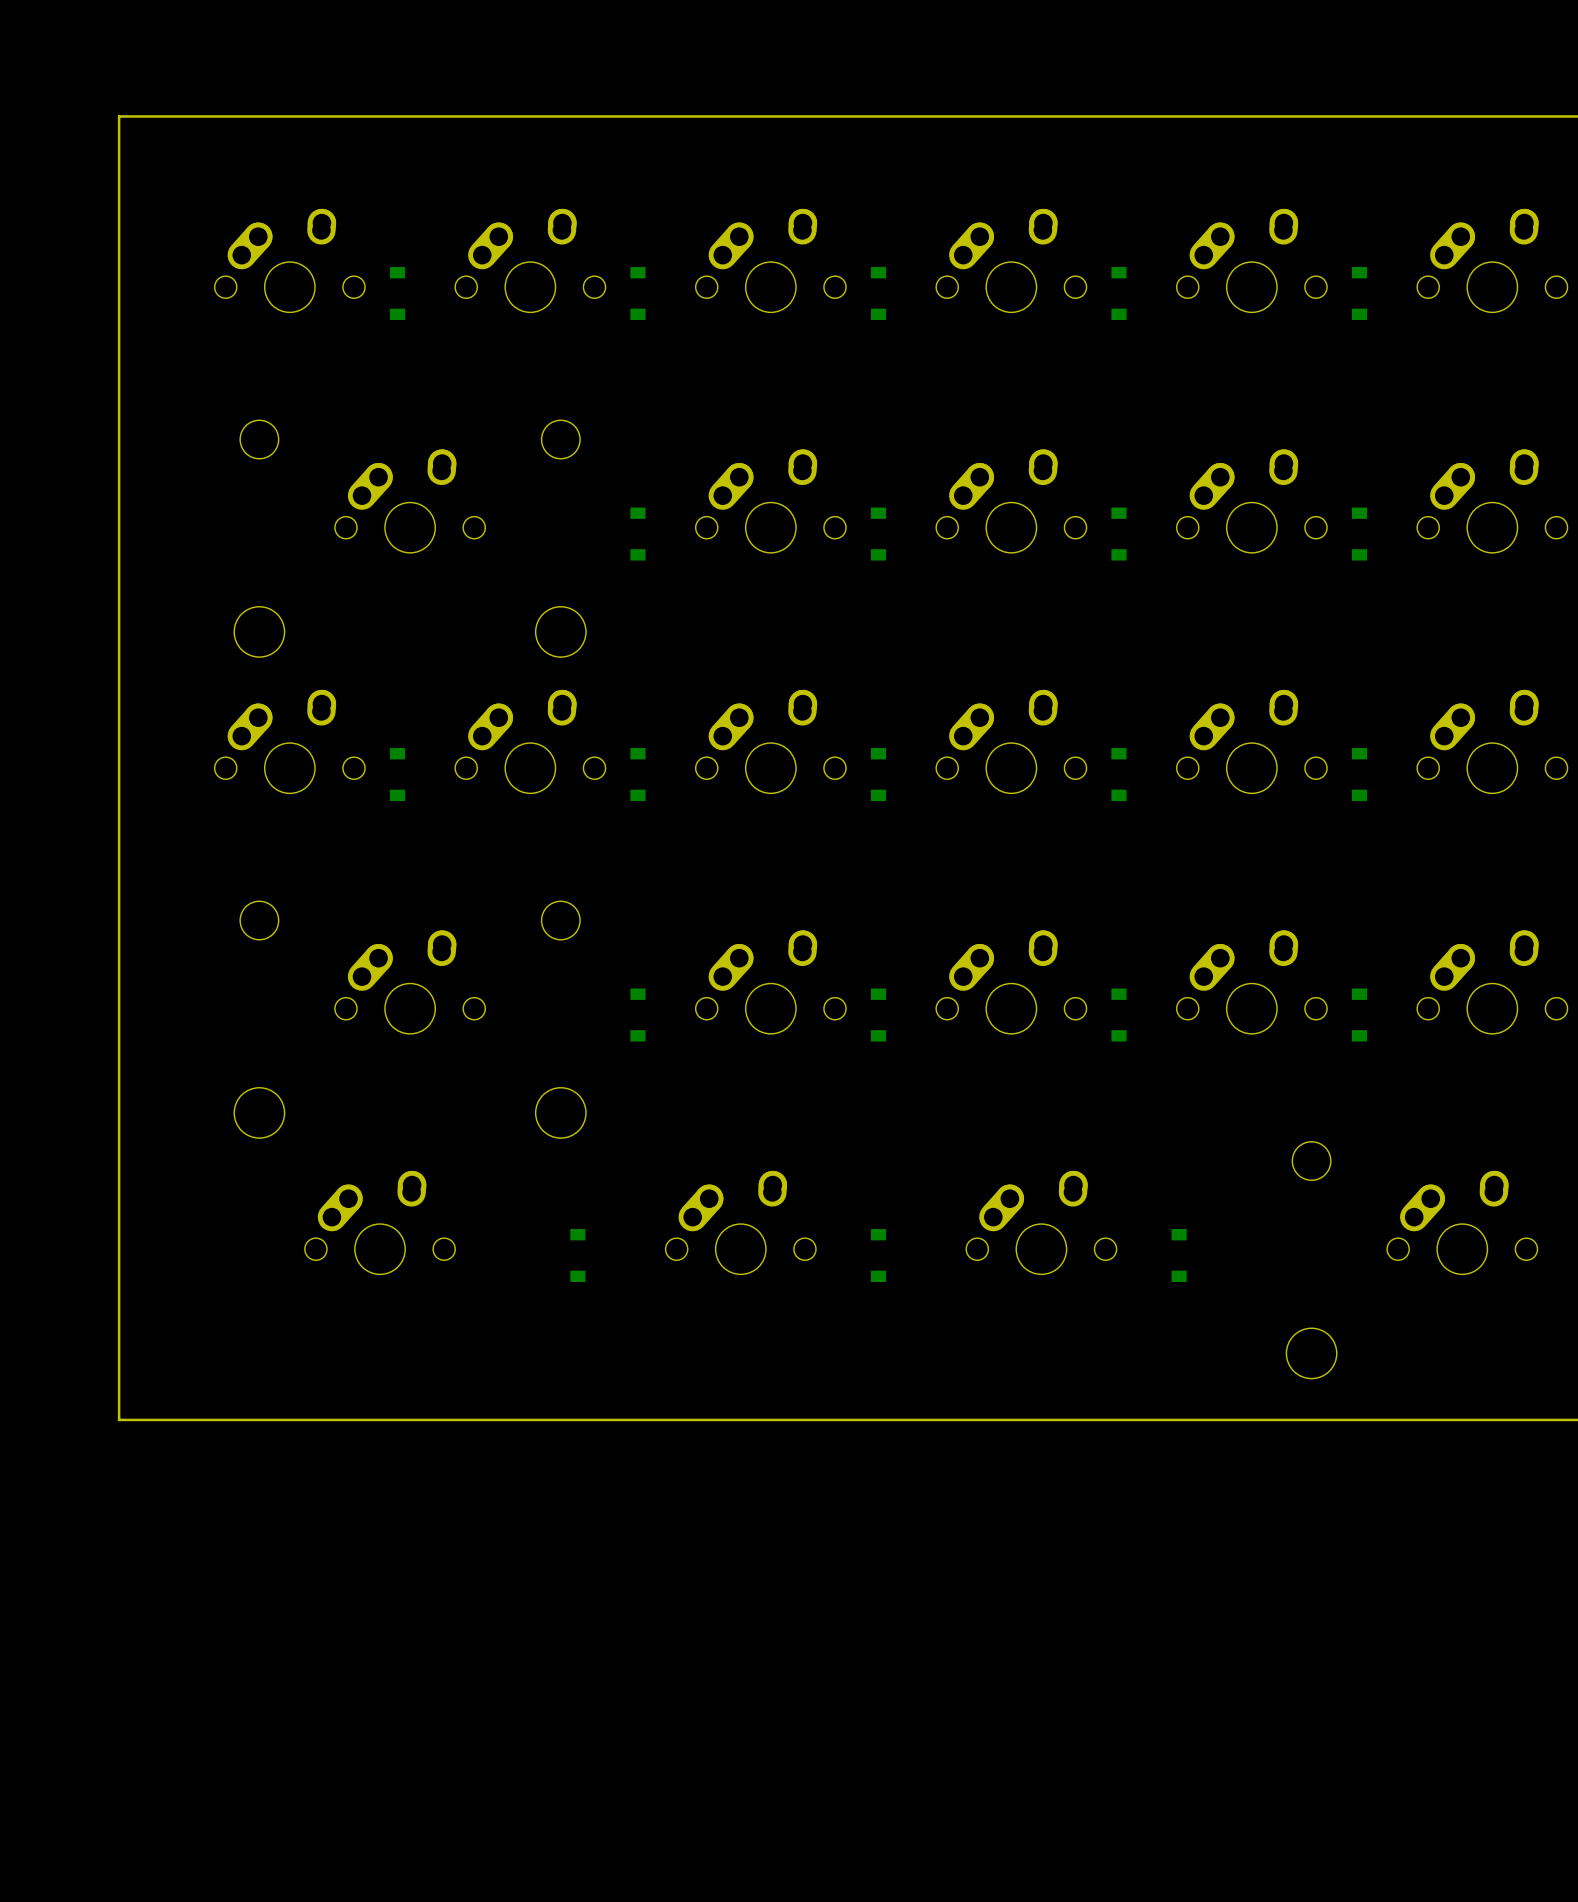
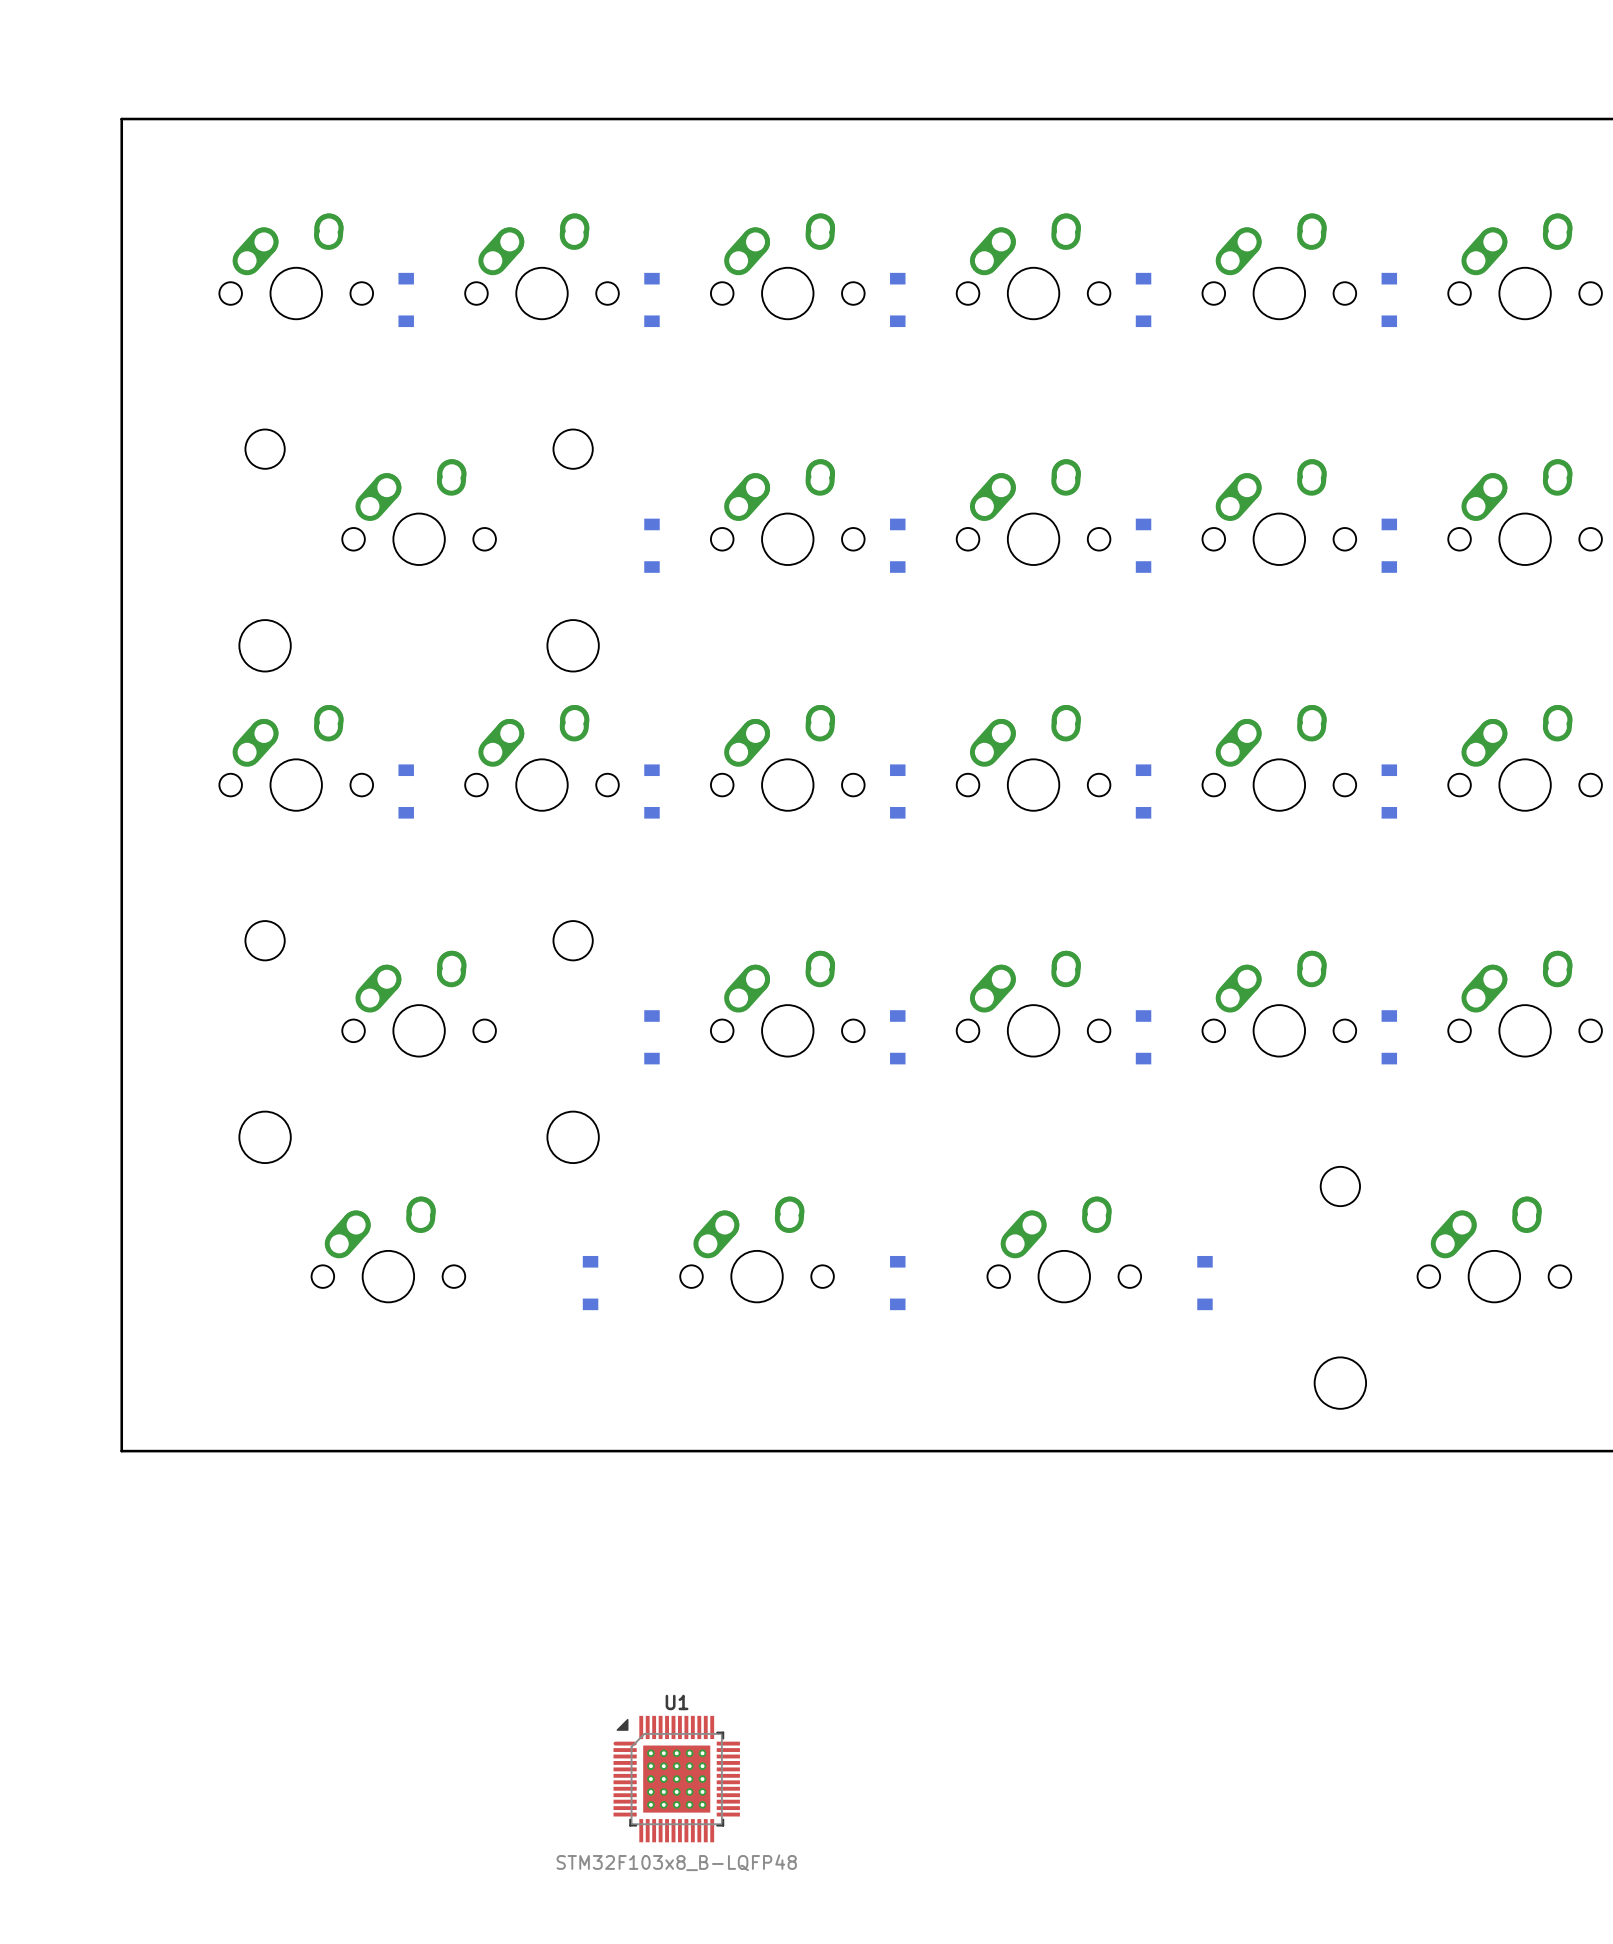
U1: none -> STM32F103x8_B-LQFP48 (676, 1779)

